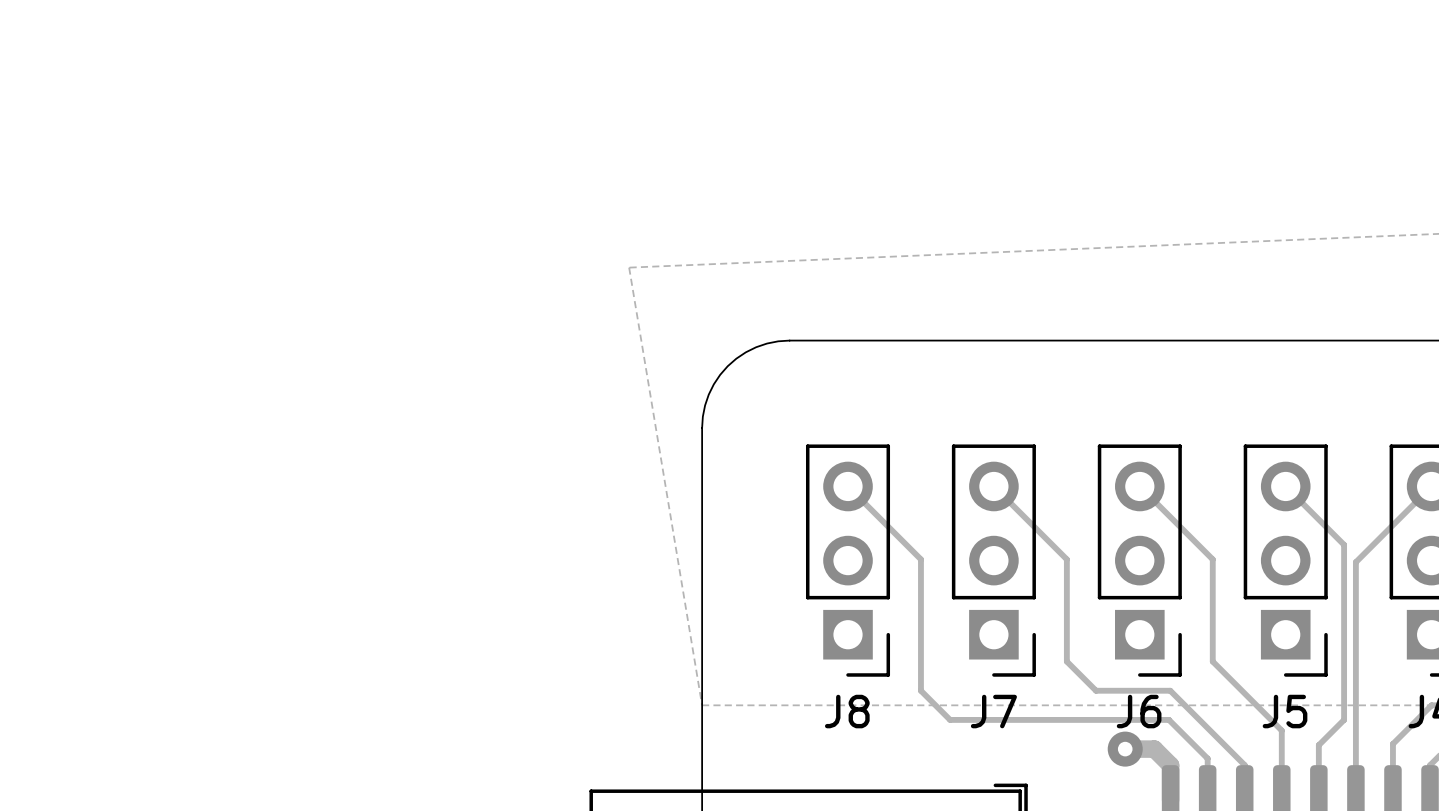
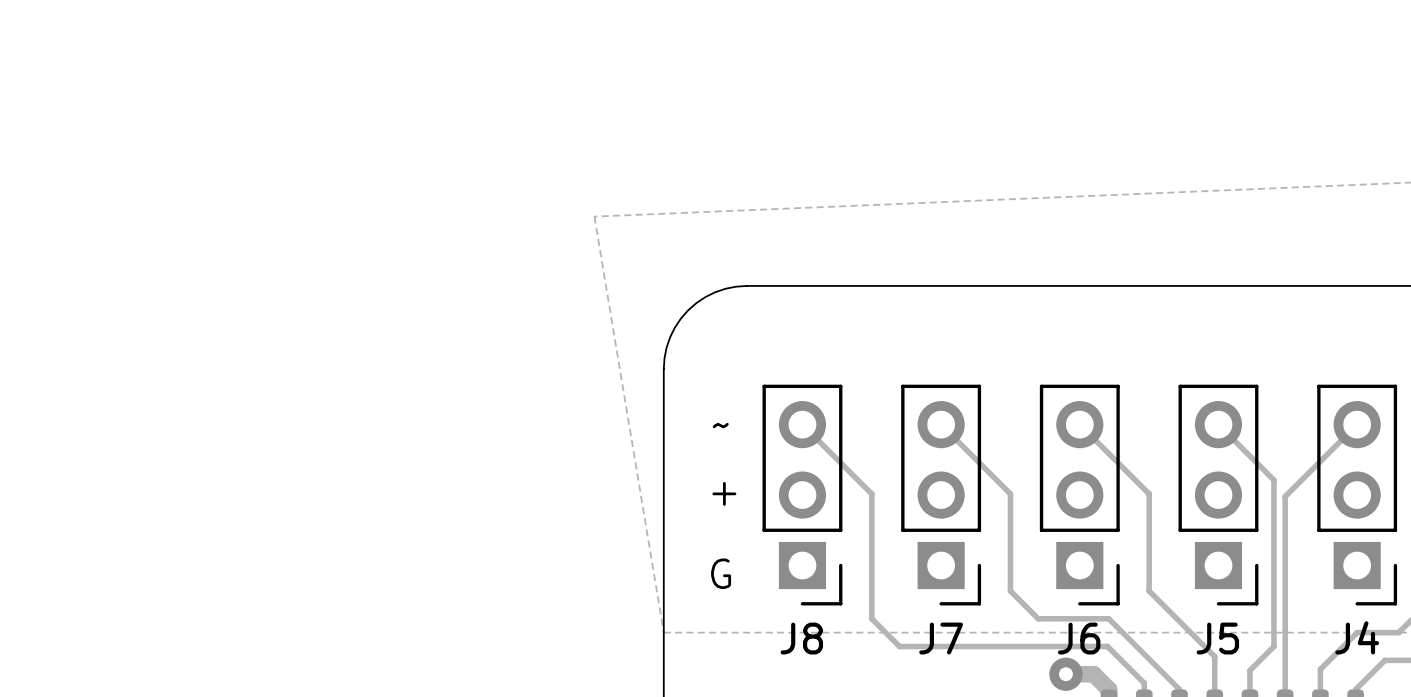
text: none -> ~ (720, 425)
text: none -> + (724, 493)
text: none -> G (721, 573)

